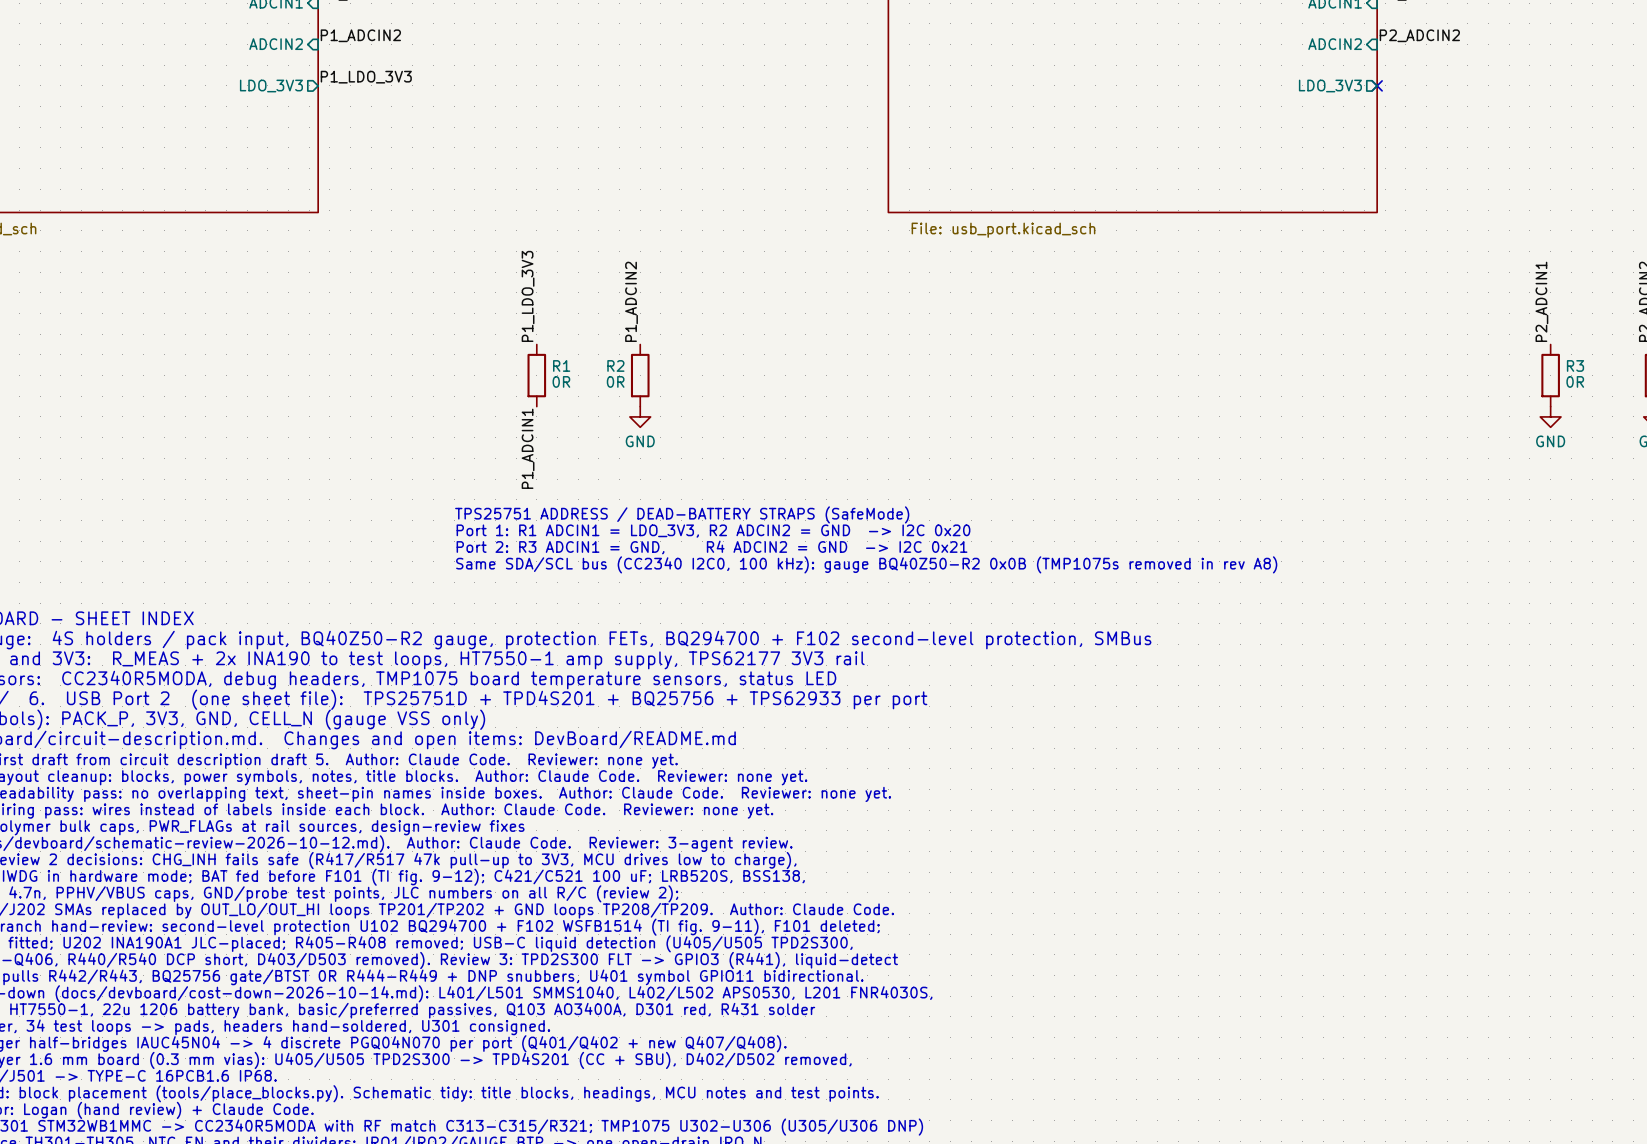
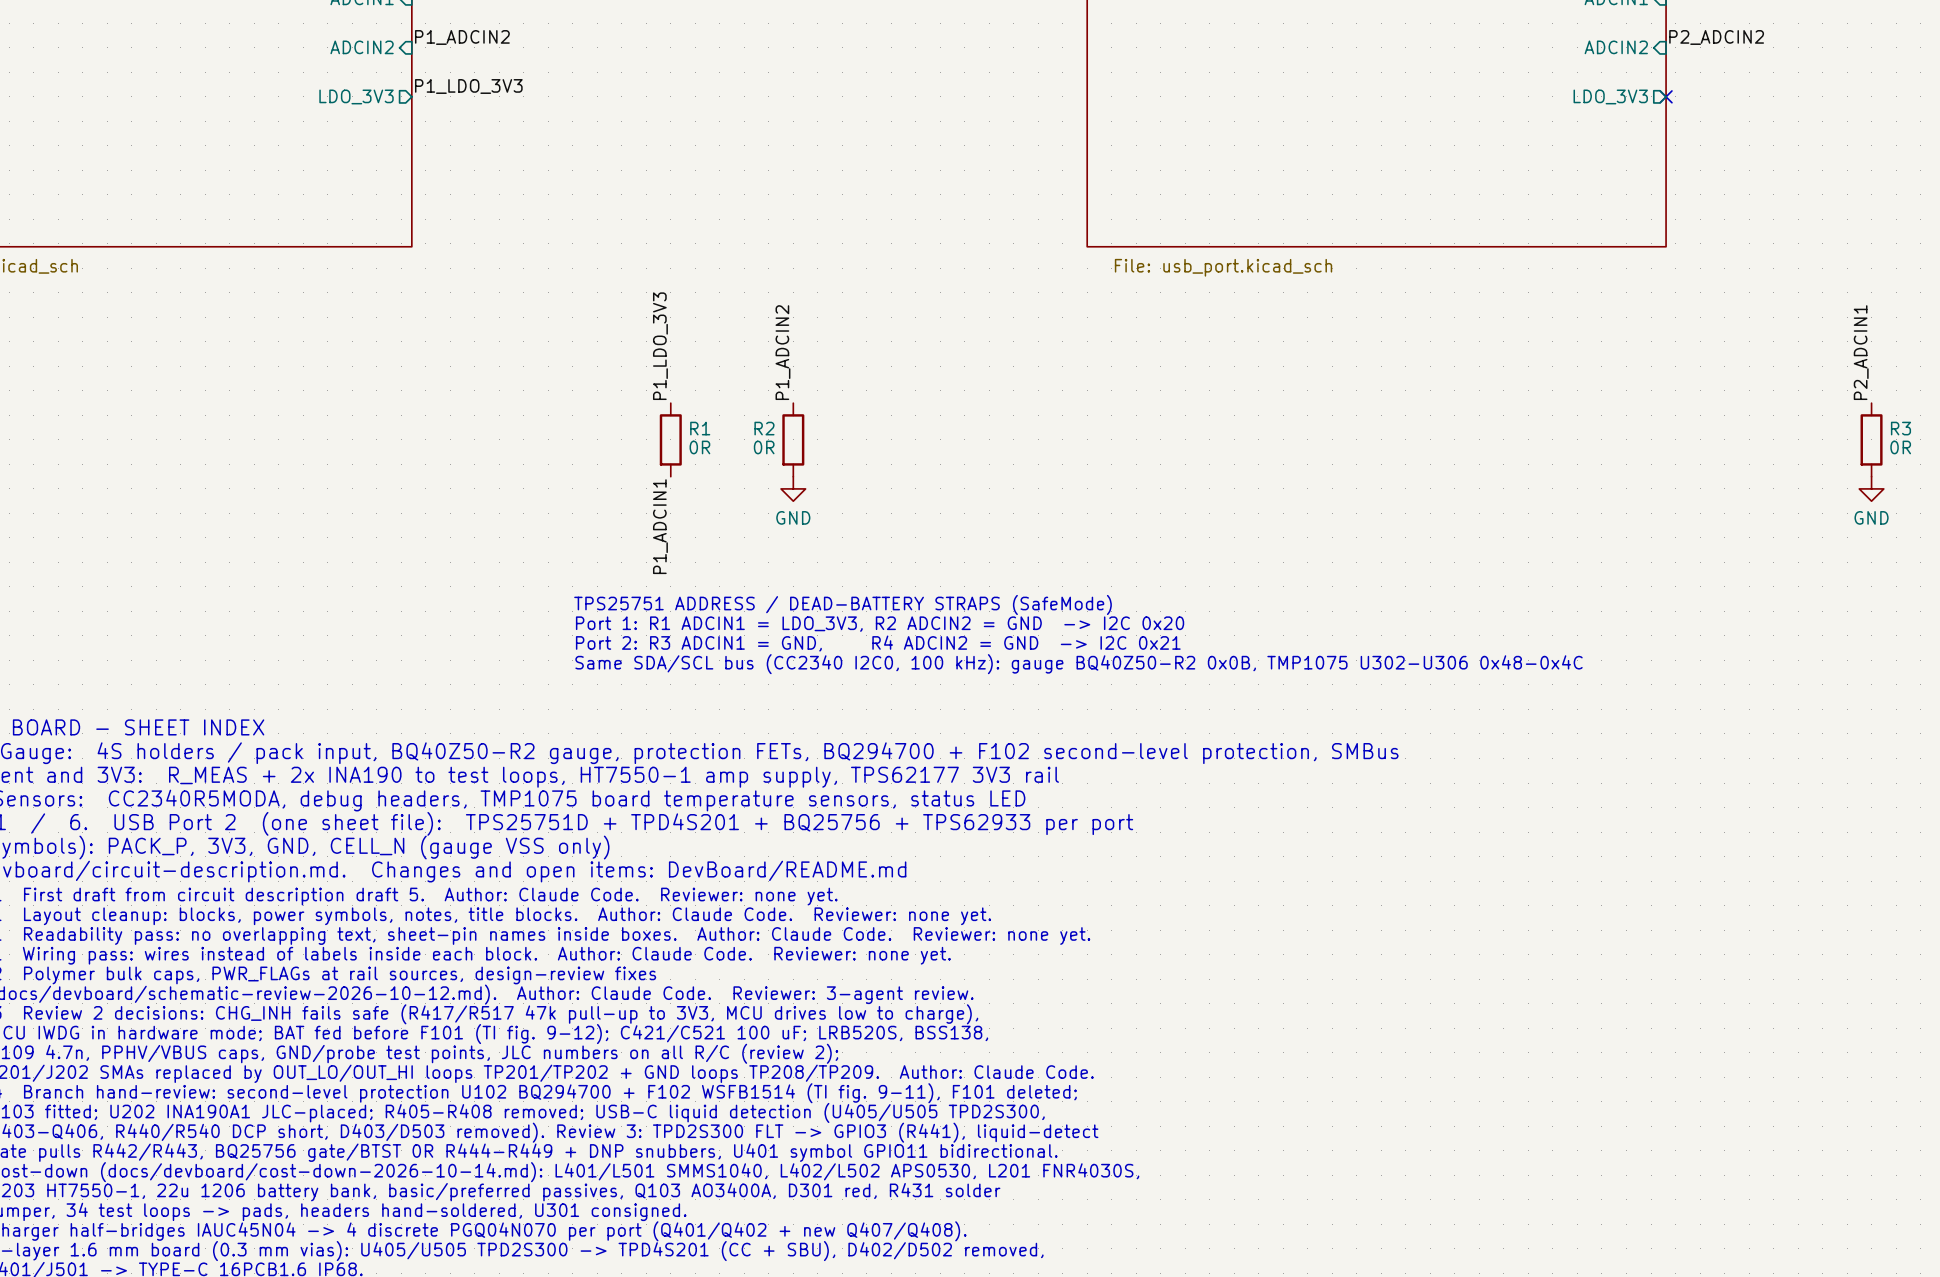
text: Same SDA/SCL bus (CC2340 I2C0, 100 kHz): gauge BQ40Z50-R2 0x0B (TMP1075s removed in rev A8) (866, 564) -> Same SDA/SCL bus (CC2340 I2C0, 100 kHz): gauge BQ40Z50-R2 0x0B, TMP1075 U302-U306 0x48-0x4C (1079, 664)

